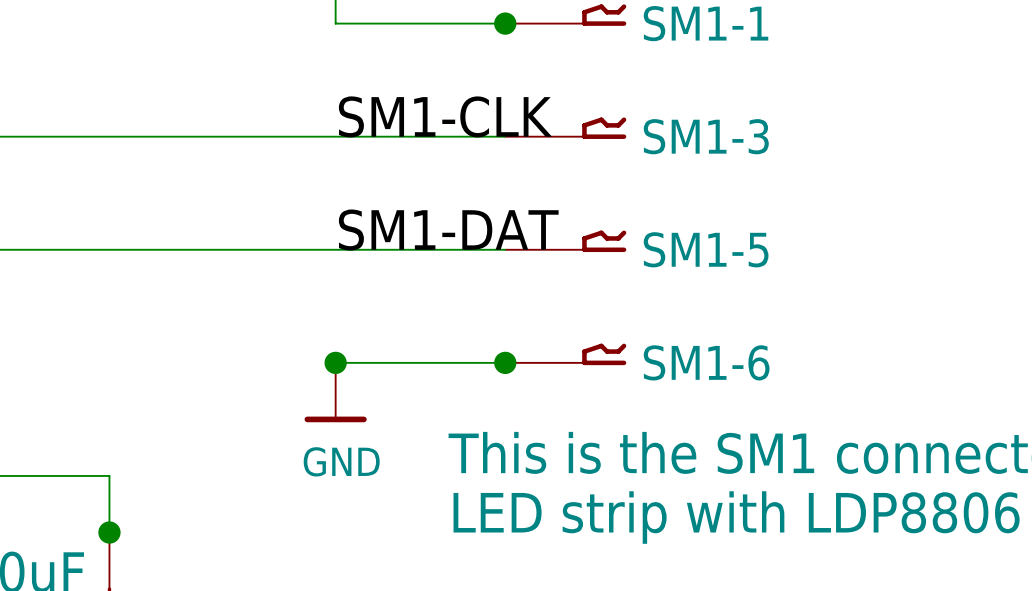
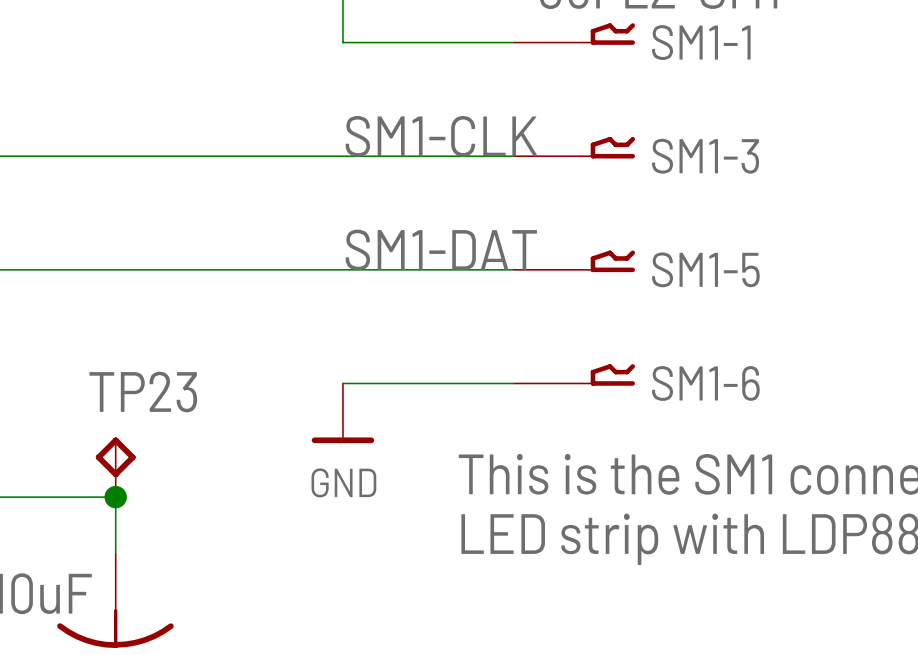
junction: (505, 23) -> none
junction: (335, 362) -> none
junction: (505, 362) -> none
TP23: none -> (115, 467)
junction position: (109, 532) -> (115, 497)

